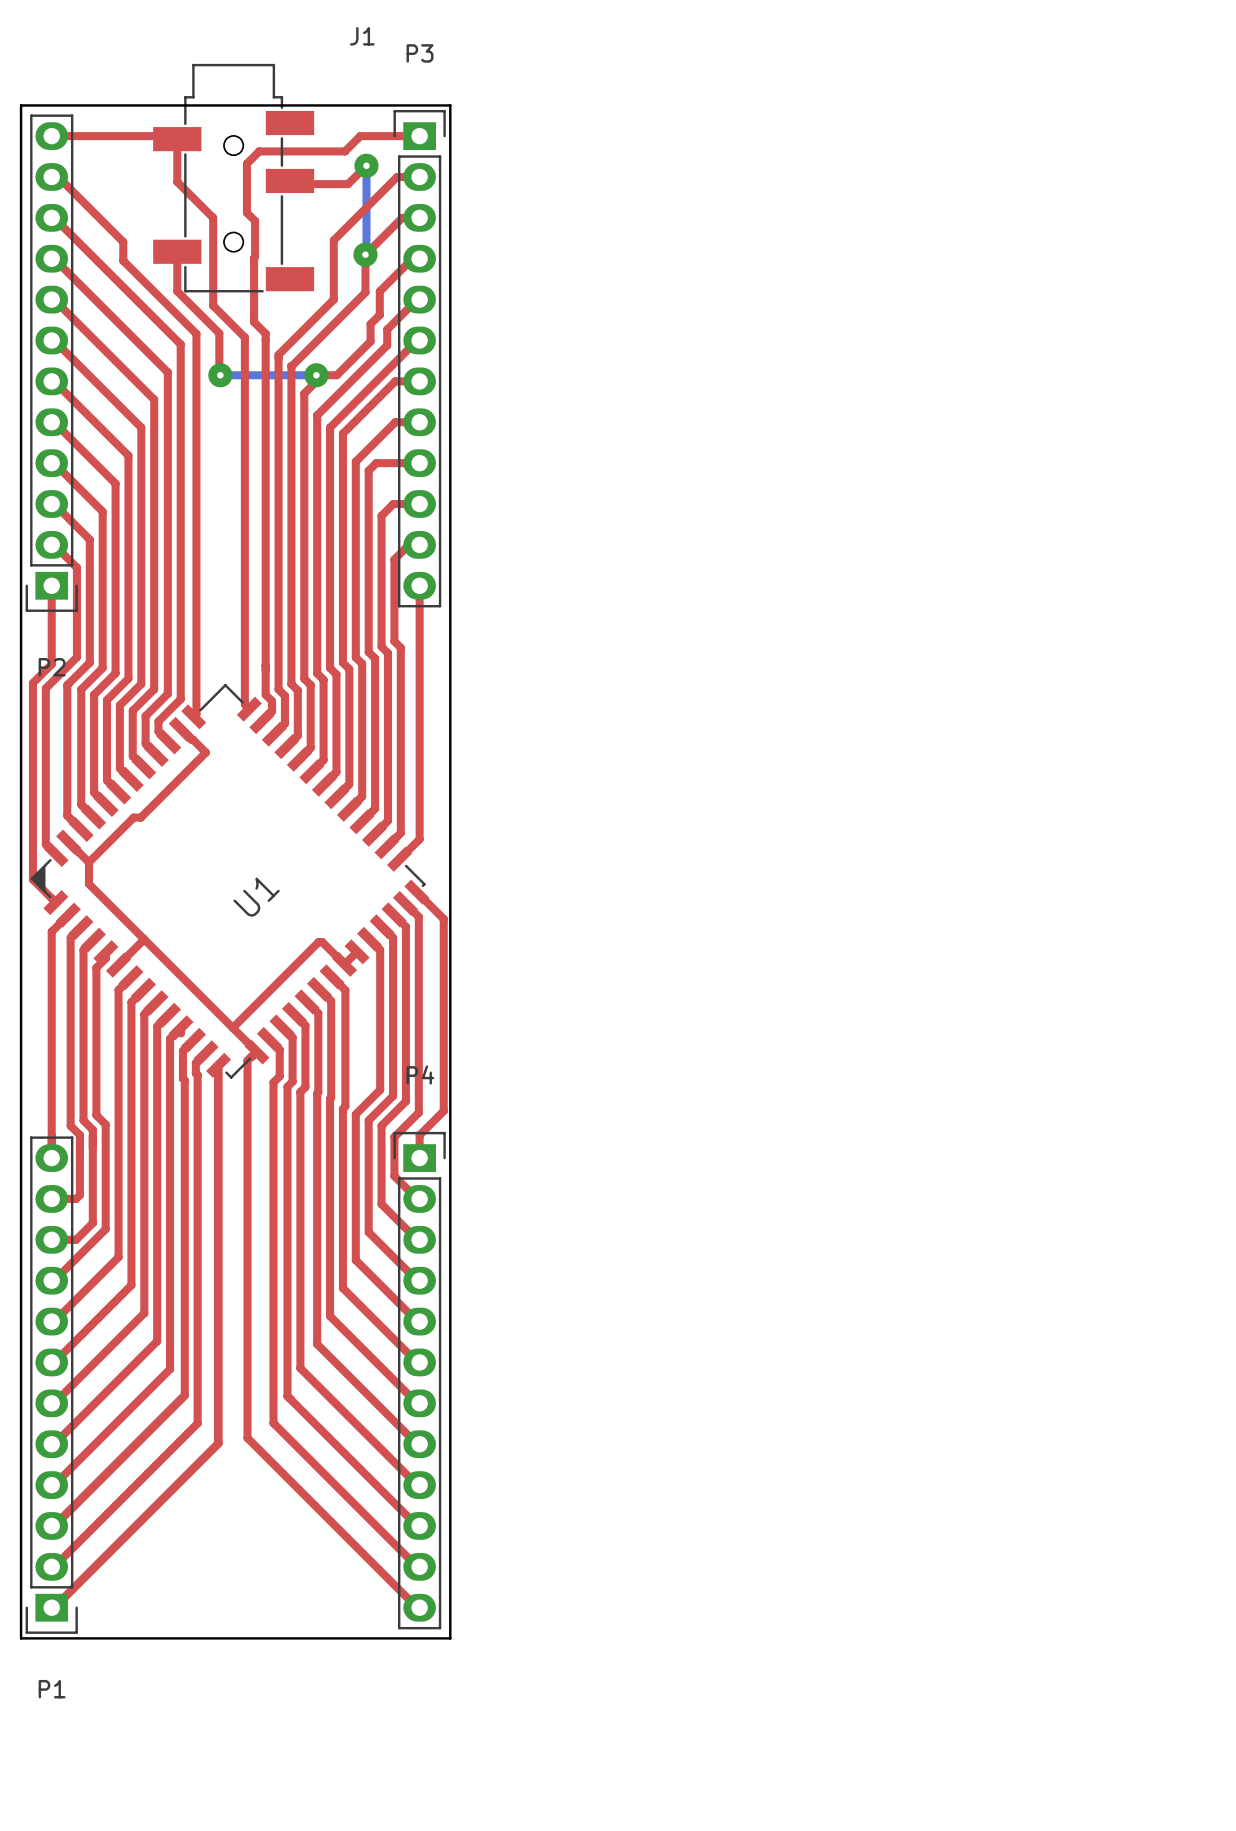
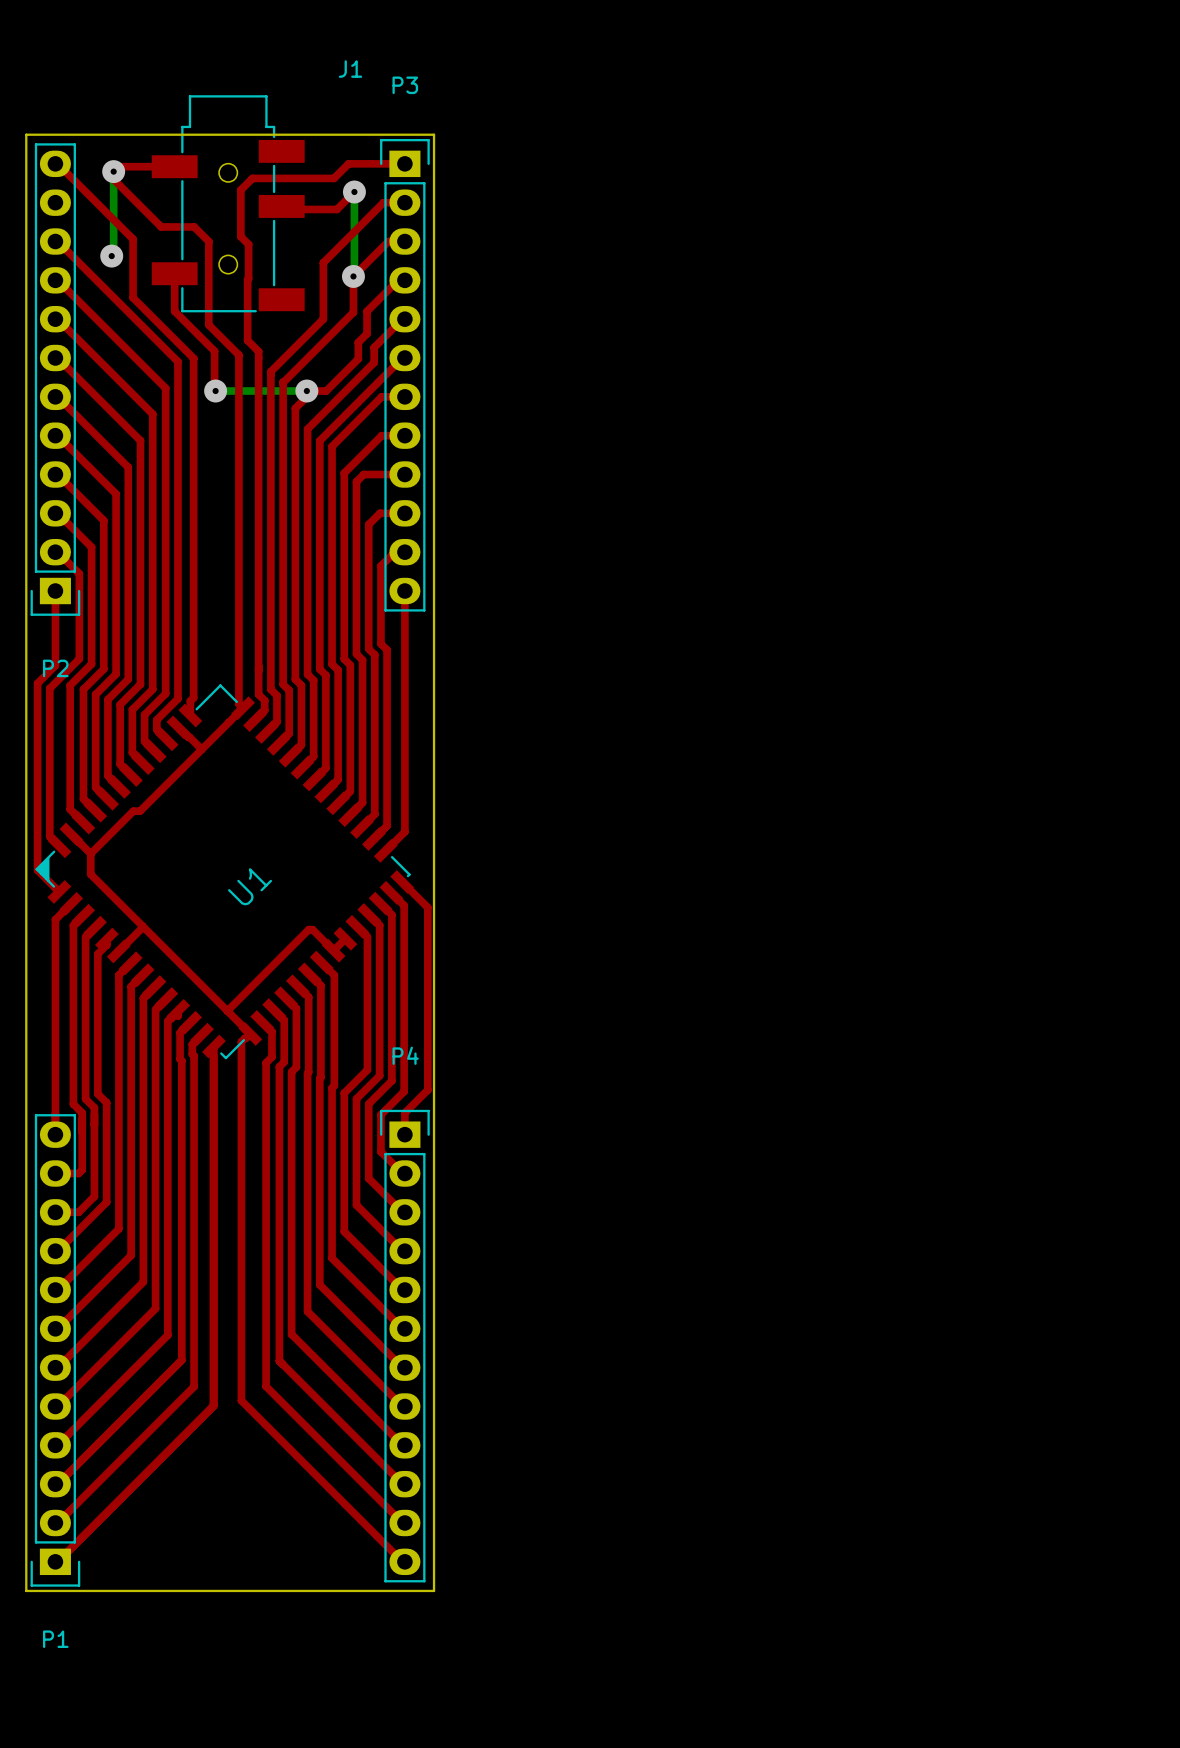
top track: (54, 136) (174, 136) (177, 139) (177, 181) (197, 202) -> (174, 166) (118, 166) (113, 171) (113, 179) (161, 226) (194, 226)
bottom track: none -> (113, 171) (113, 254) (111, 256)
via: none -> (113, 171)
top track: (58, 176) (123, 241) (123, 260) (196, 333) (196, 714) (193, 716) -> (57, 163) (133, 239) (133, 297) (193, 358) (193, 697) (190, 701) (190, 715)
via: none -> (111, 256)
top track: none -> (243, 708) (201, 749)

